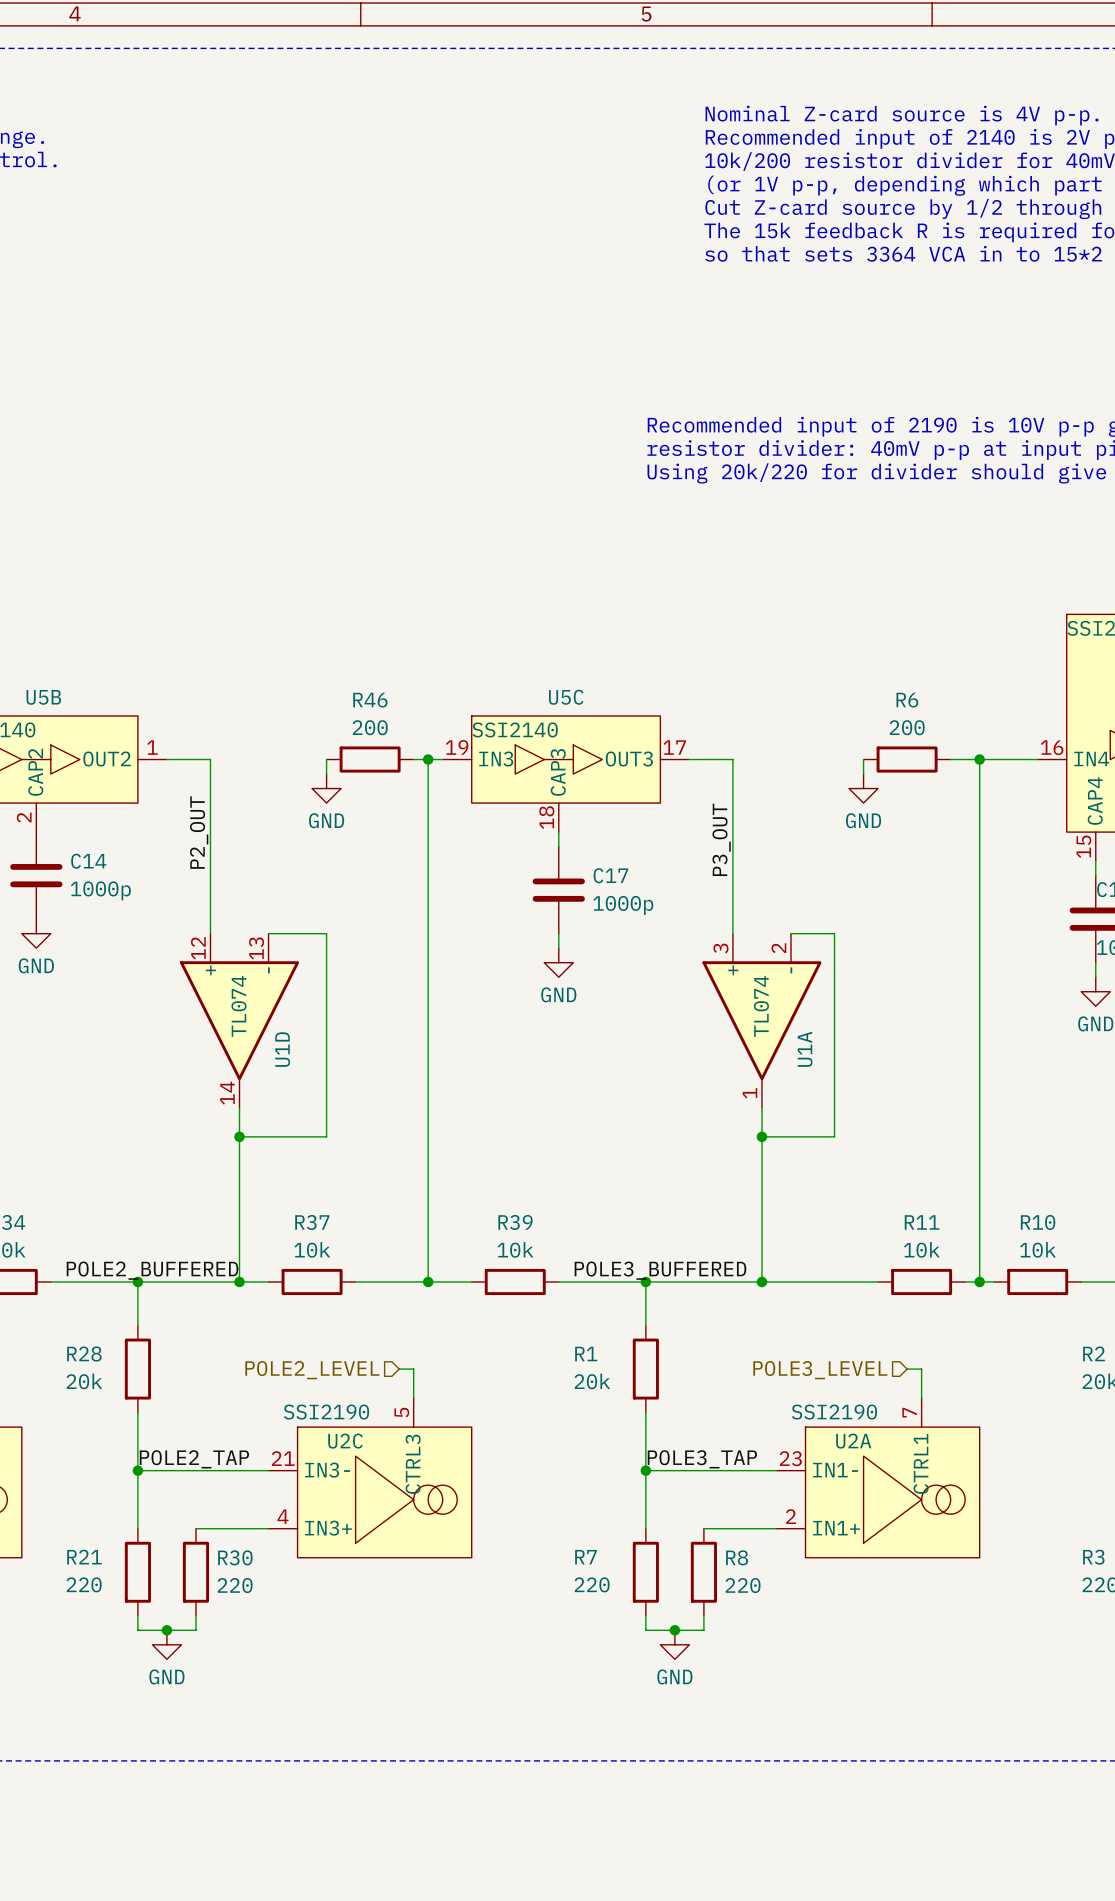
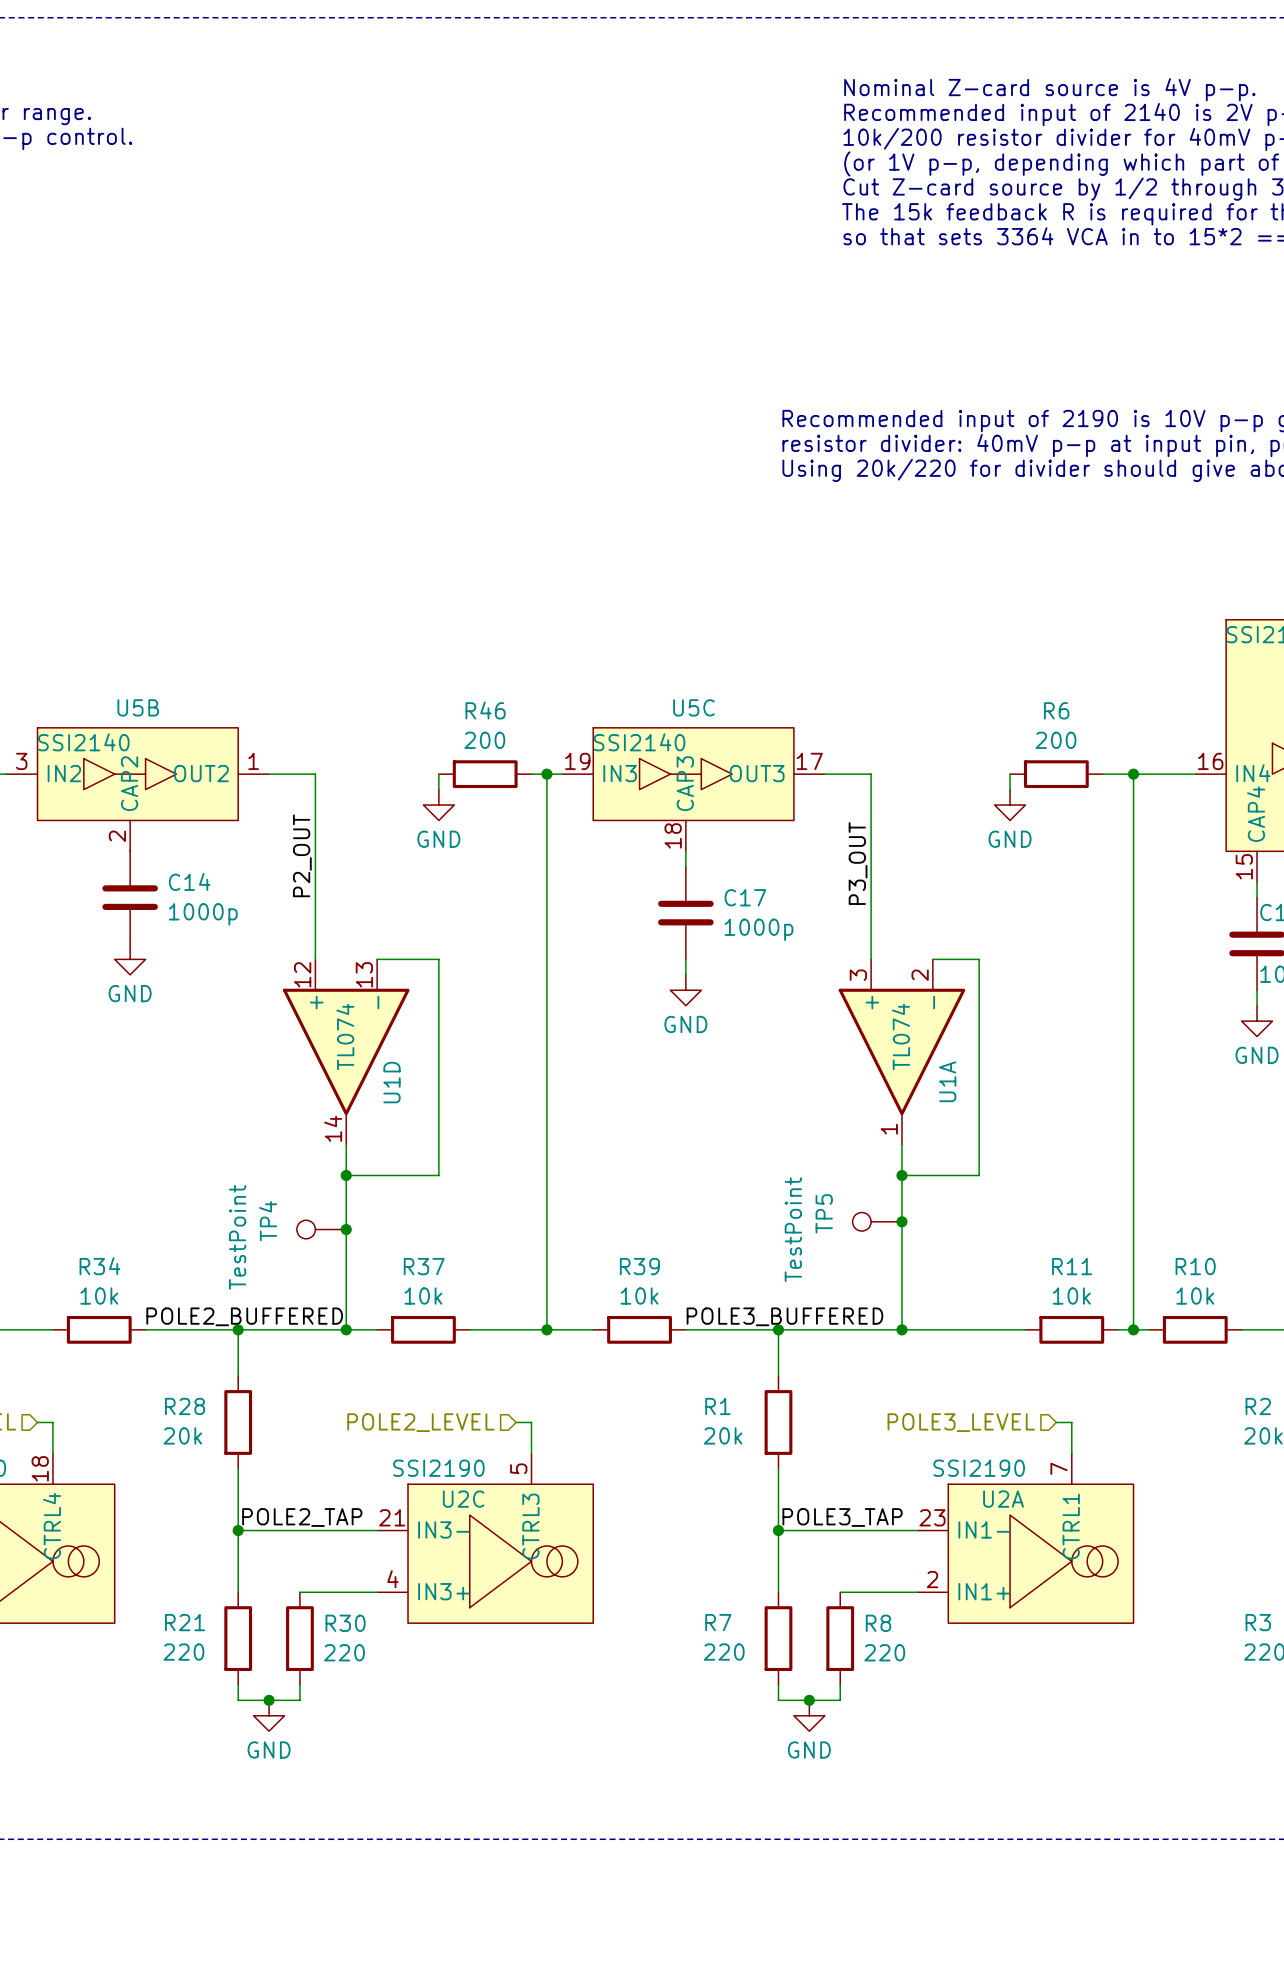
TP5: none -> TestPoint (877, 1221)
junction: none -> (901, 1221)
TP4: none -> TestPoint (321, 1229)
junction: none -> (346, 1229)

